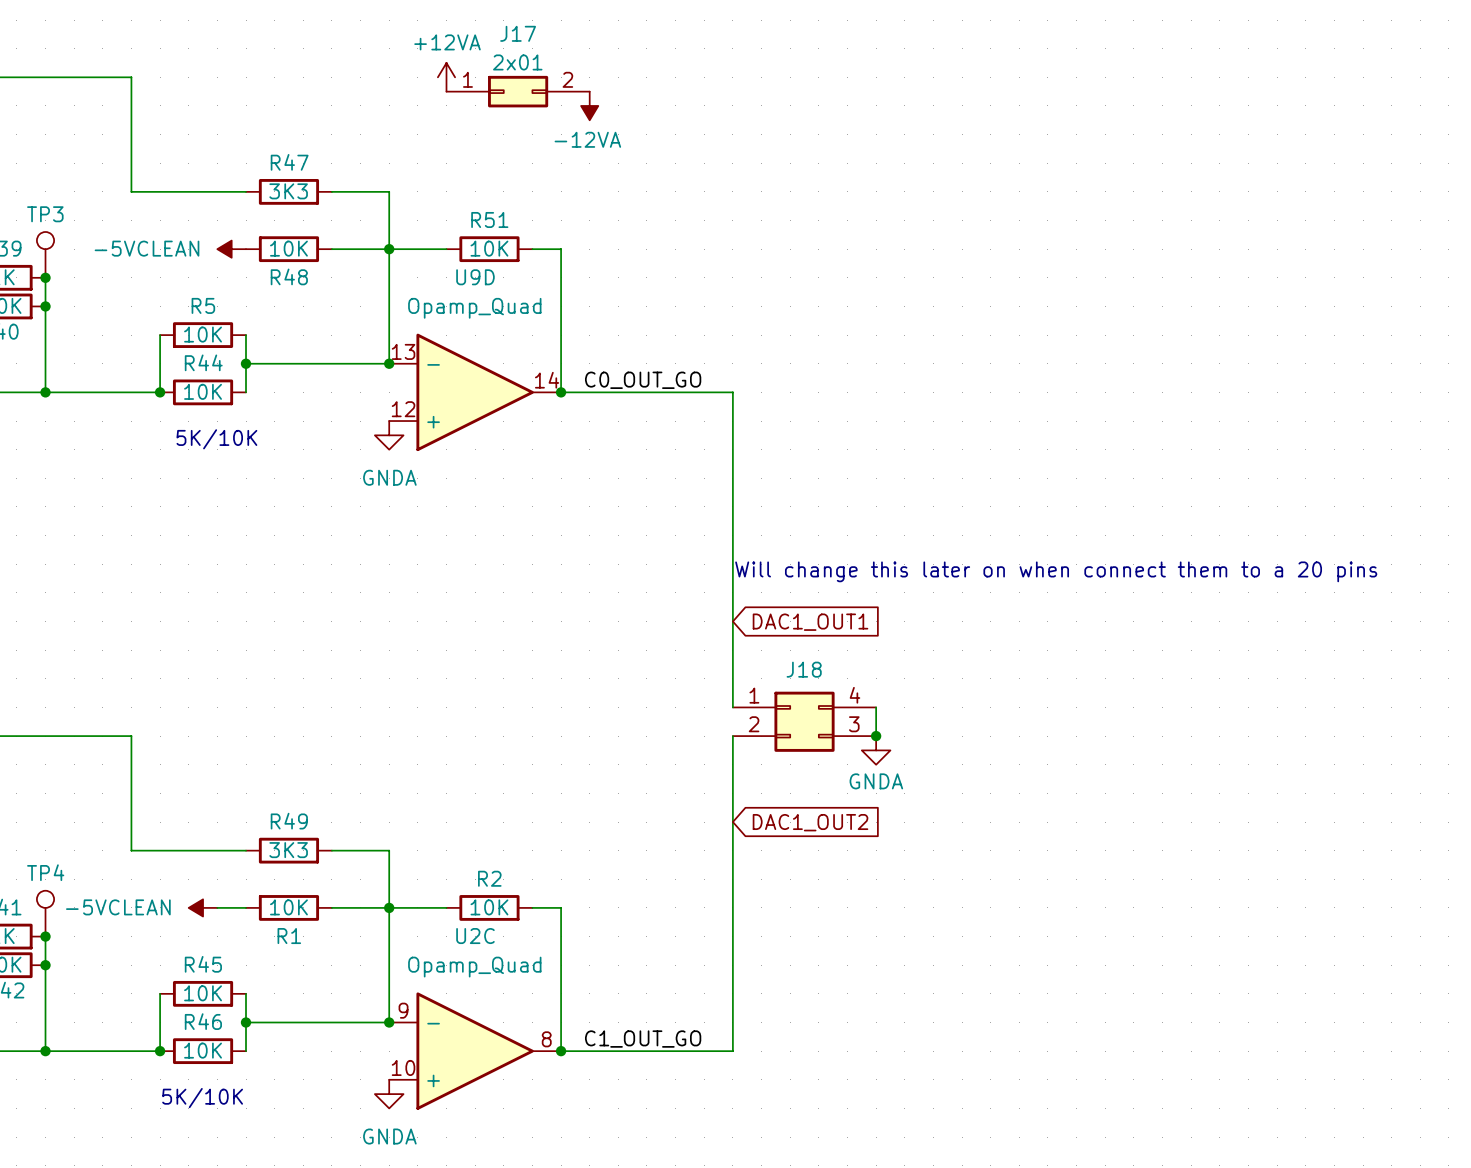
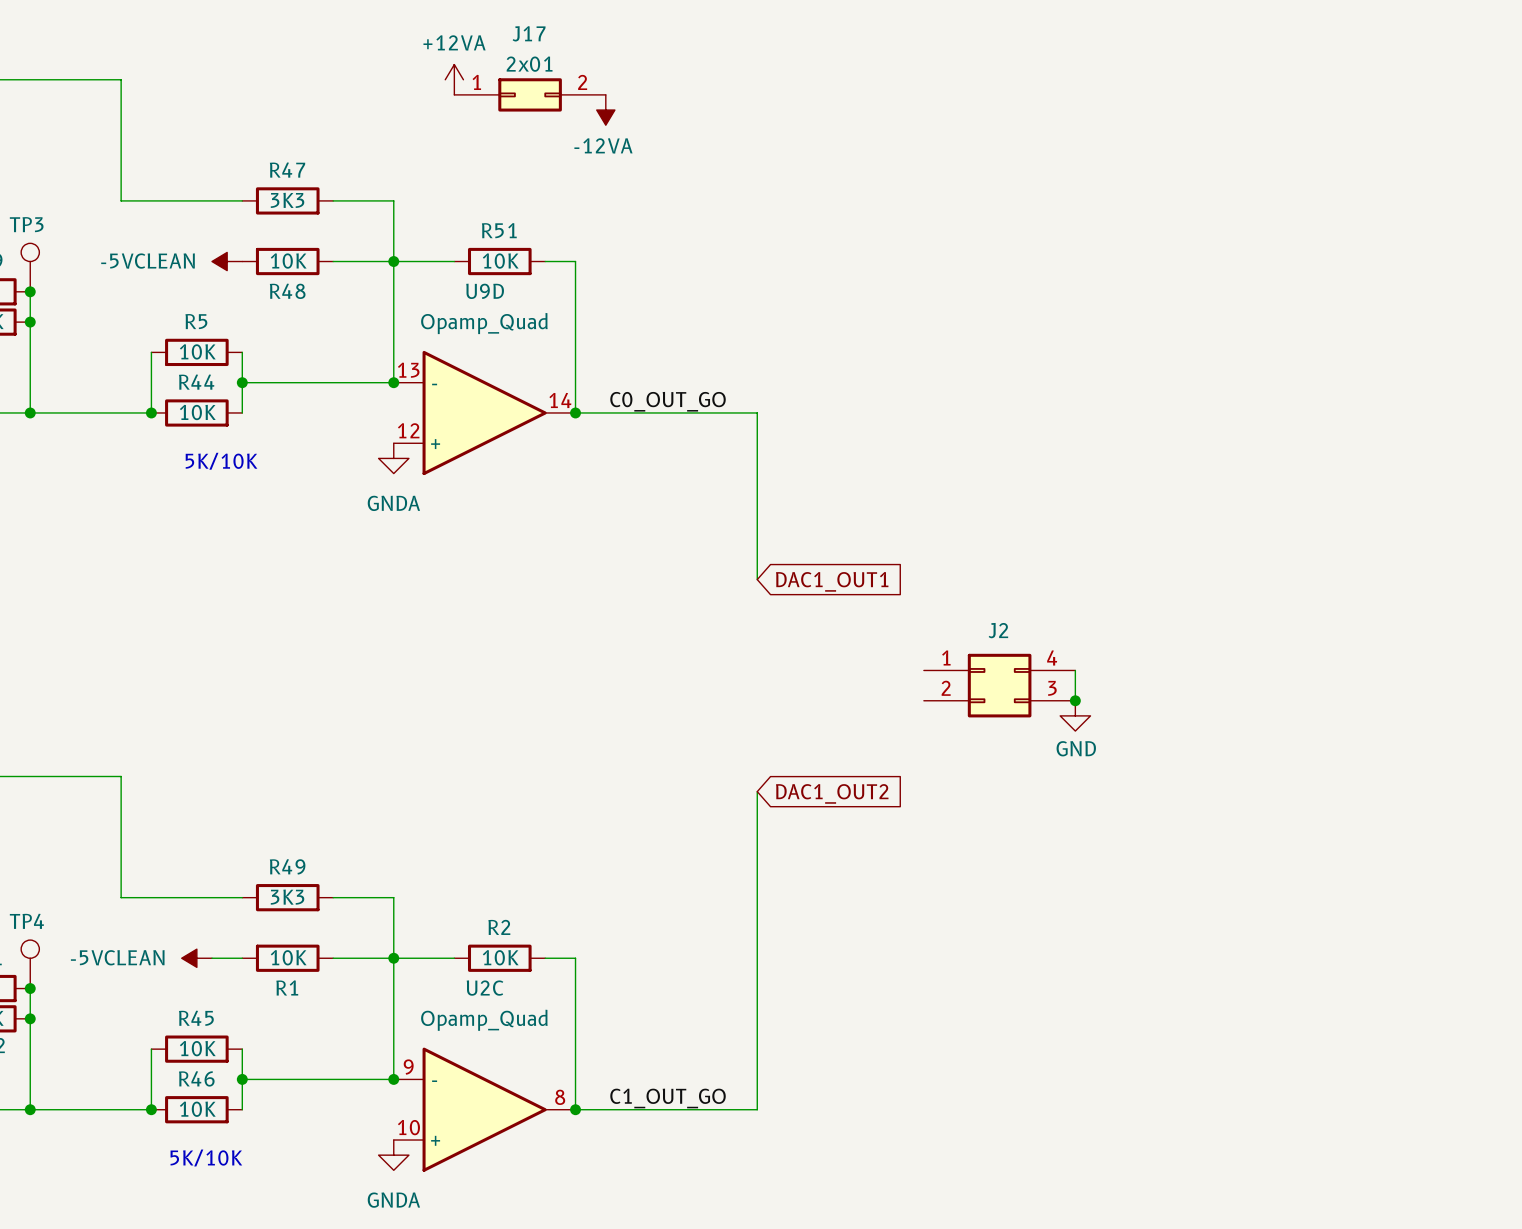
wire: (732, 549) (732, 707) -> none
text: Will change this later on when connect them to a 20 pins (1056, 571) -> none
global label position: DAC1_OUT1 (810, 622) -> DAC1_OUT1 (832, 581)
J2: none -> (999, 685)
junction: none -> (1075, 700)
power symbol: none -> GND (1075, 715)
wire: (876, 707) (876, 736) -> (1075, 670) (1075, 700)
J18: (804, 721) -> none
wire: (732, 736) (732, 750) -> none
junction: (876, 736) -> none
power symbol: GNDA (876, 750) -> none
global label position: DAC1_OUT2 (810, 822) -> DAC1_OUT2 (832, 793)

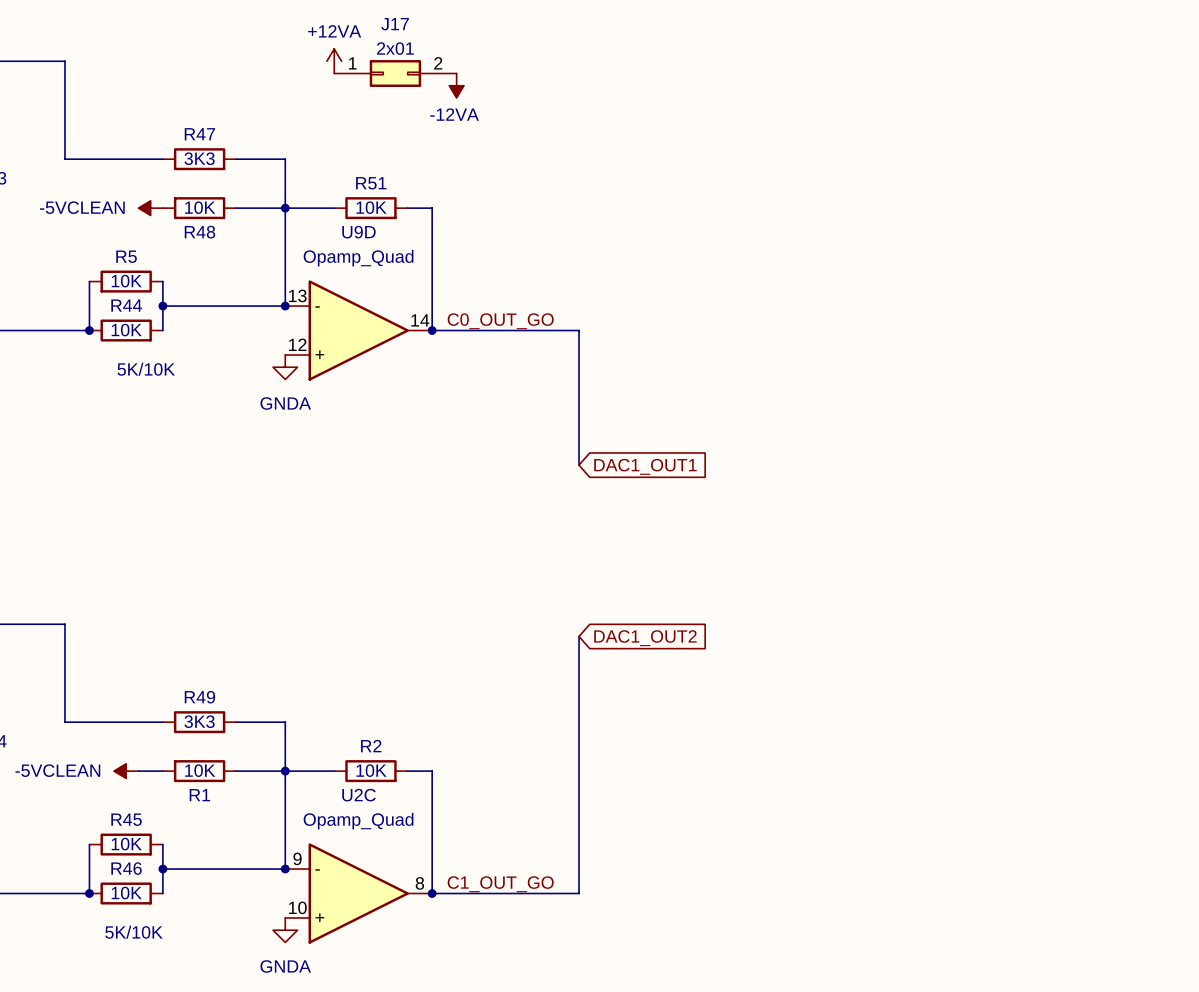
wire: (1075, 670) (1075, 700) -> none
J2: (999, 685) -> none
junction: (1075, 700) -> none
power symbol: GND (1075, 715) -> none

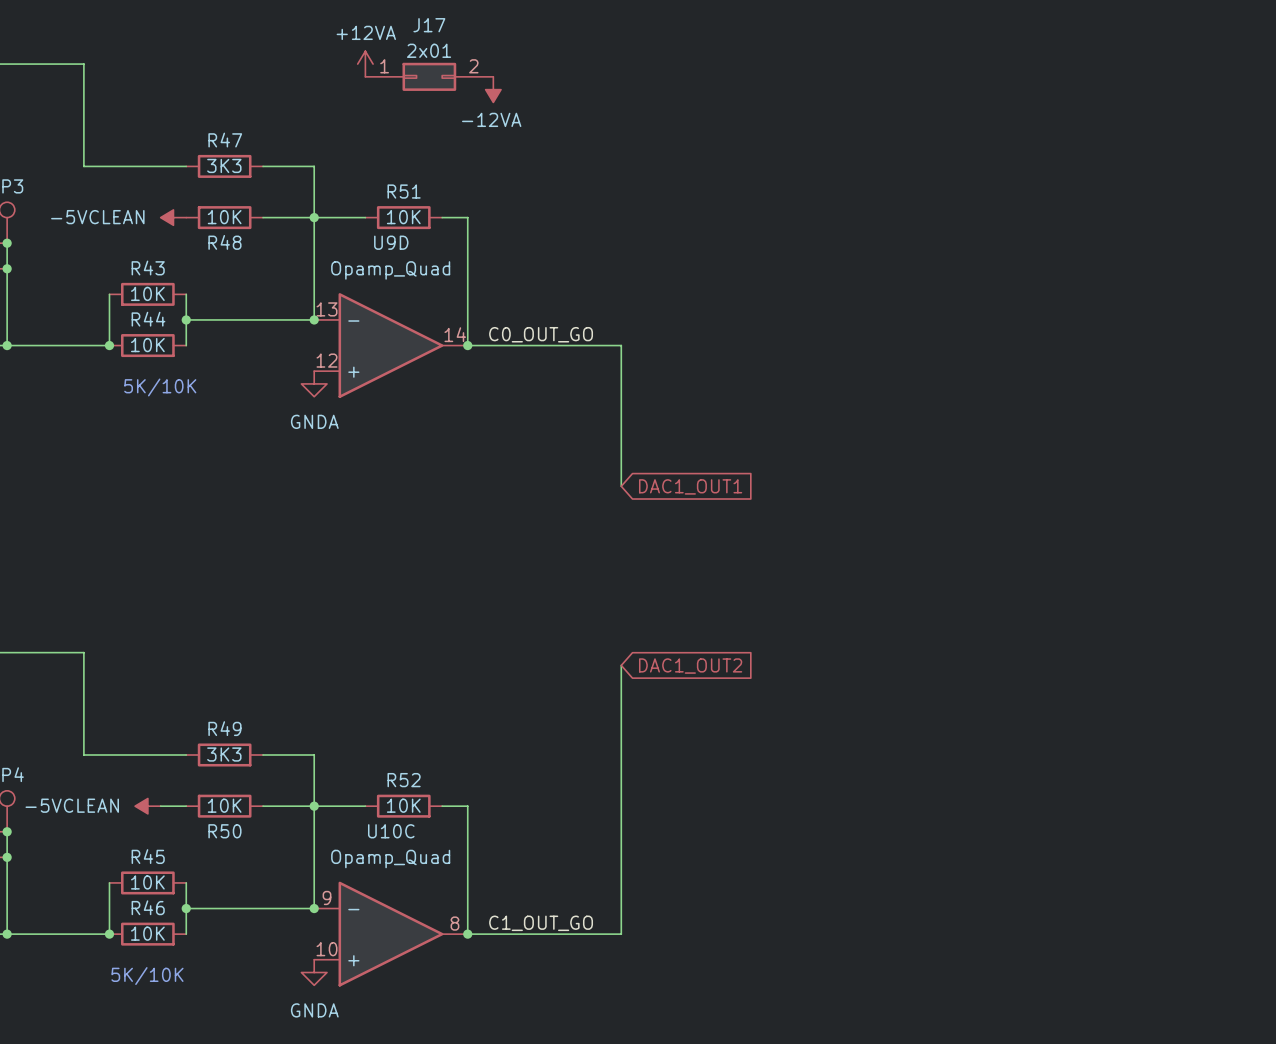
R5 name: R5 (126, 256) -> R43 (148, 268)
R2 name: R2 (371, 746) -> R52 (404, 780)
R1 name: R1 (199, 795) -> R50 (224, 831)
U2C name: U2C (359, 795) -> U10C (391, 831)

